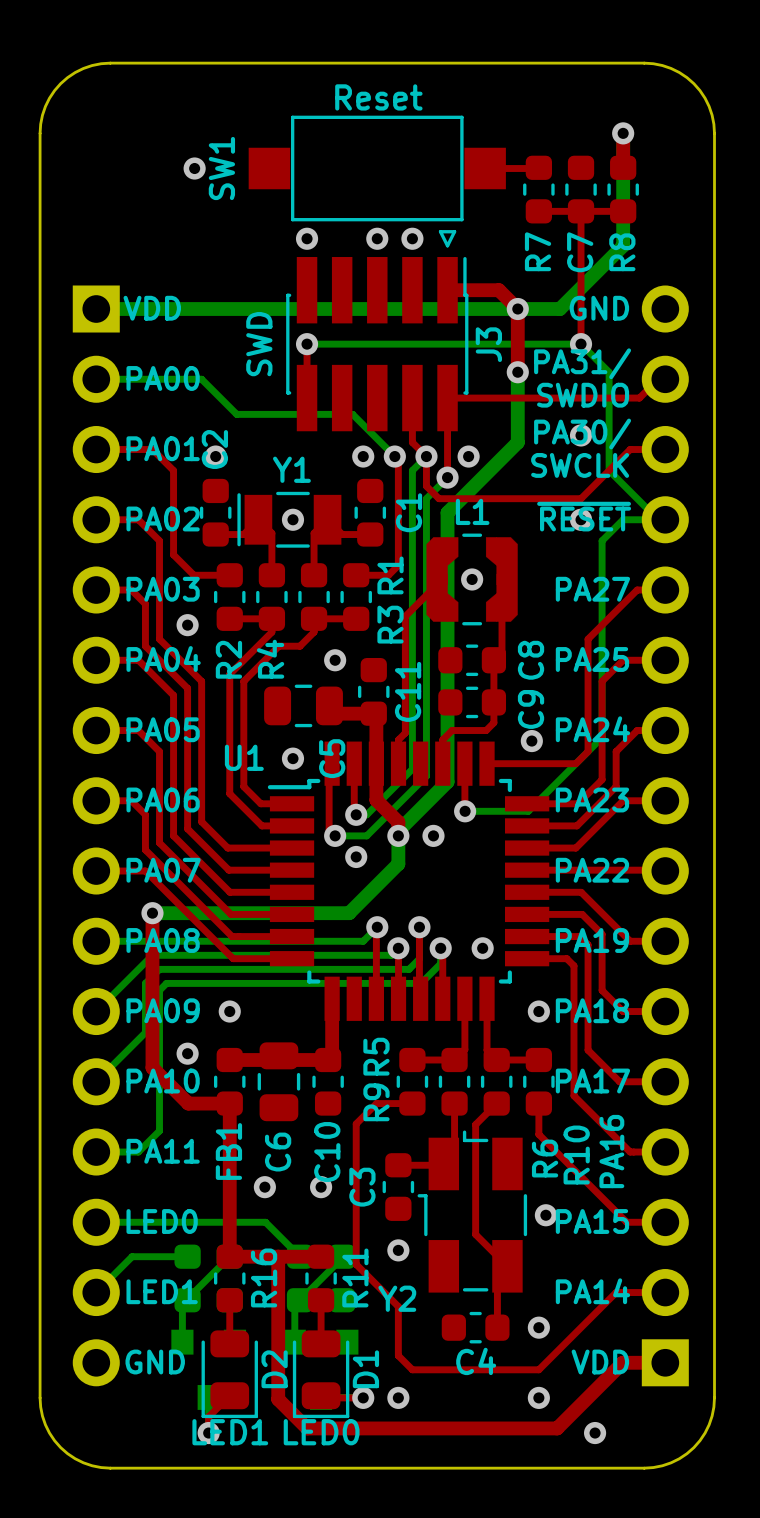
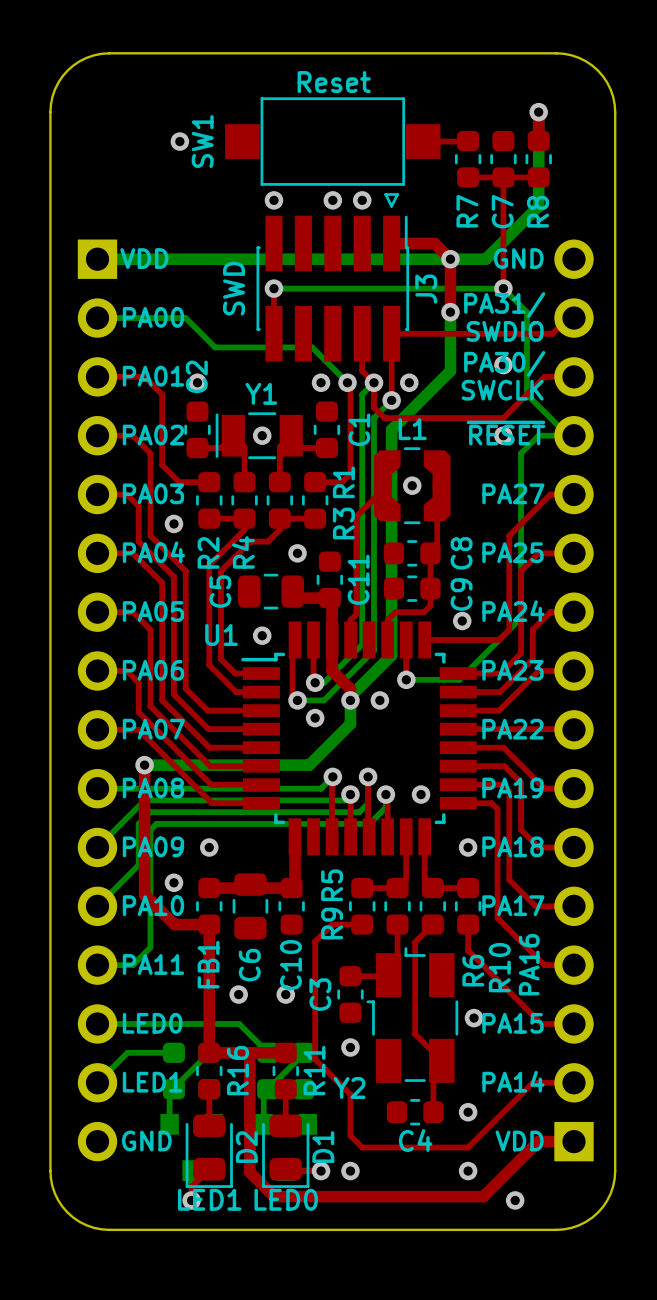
C5 name position: C5 (332, 758) -> C5 (220, 591)

